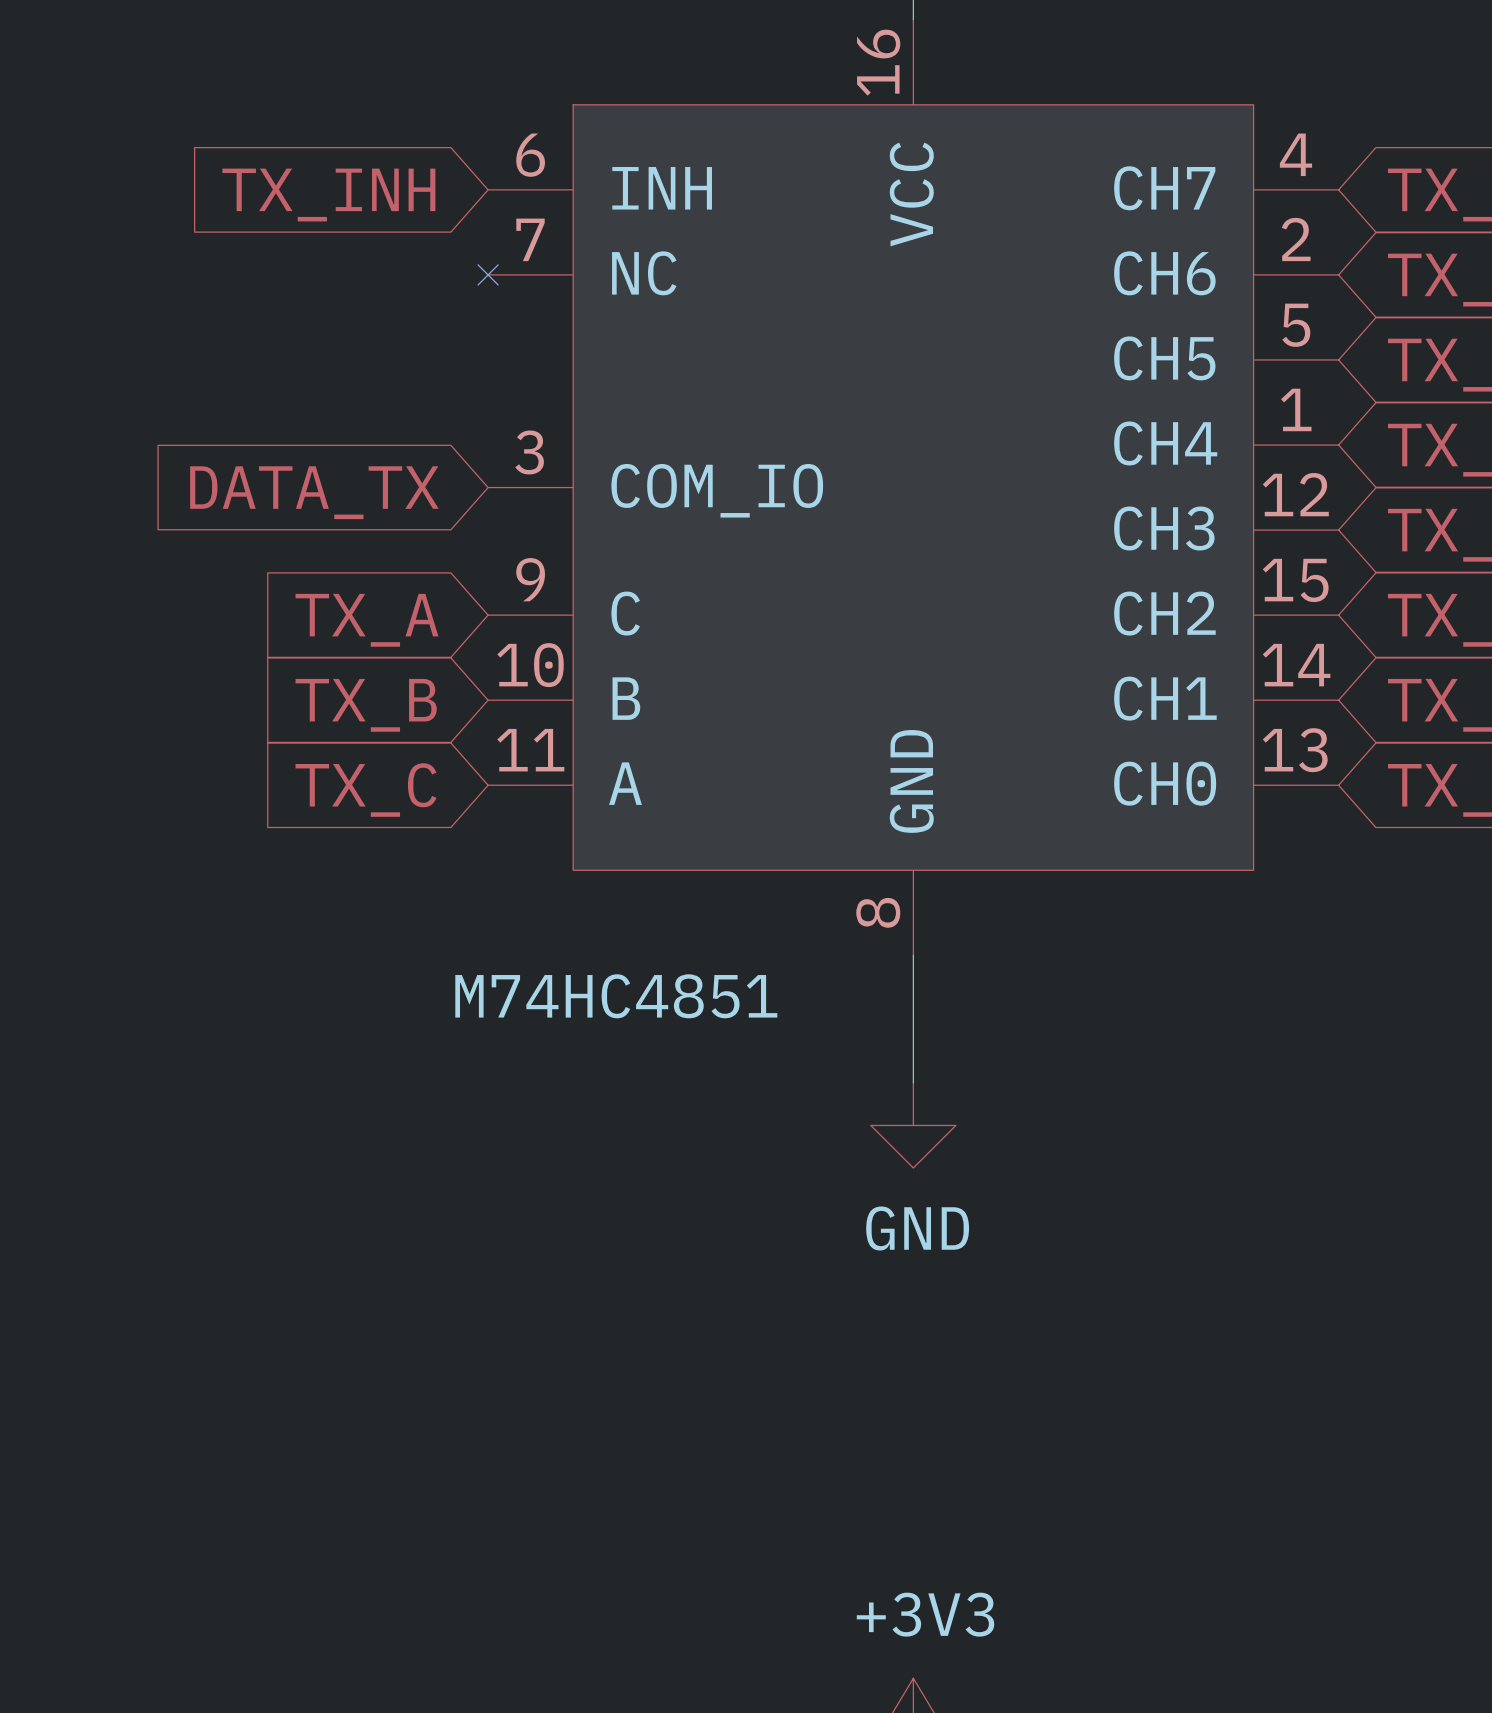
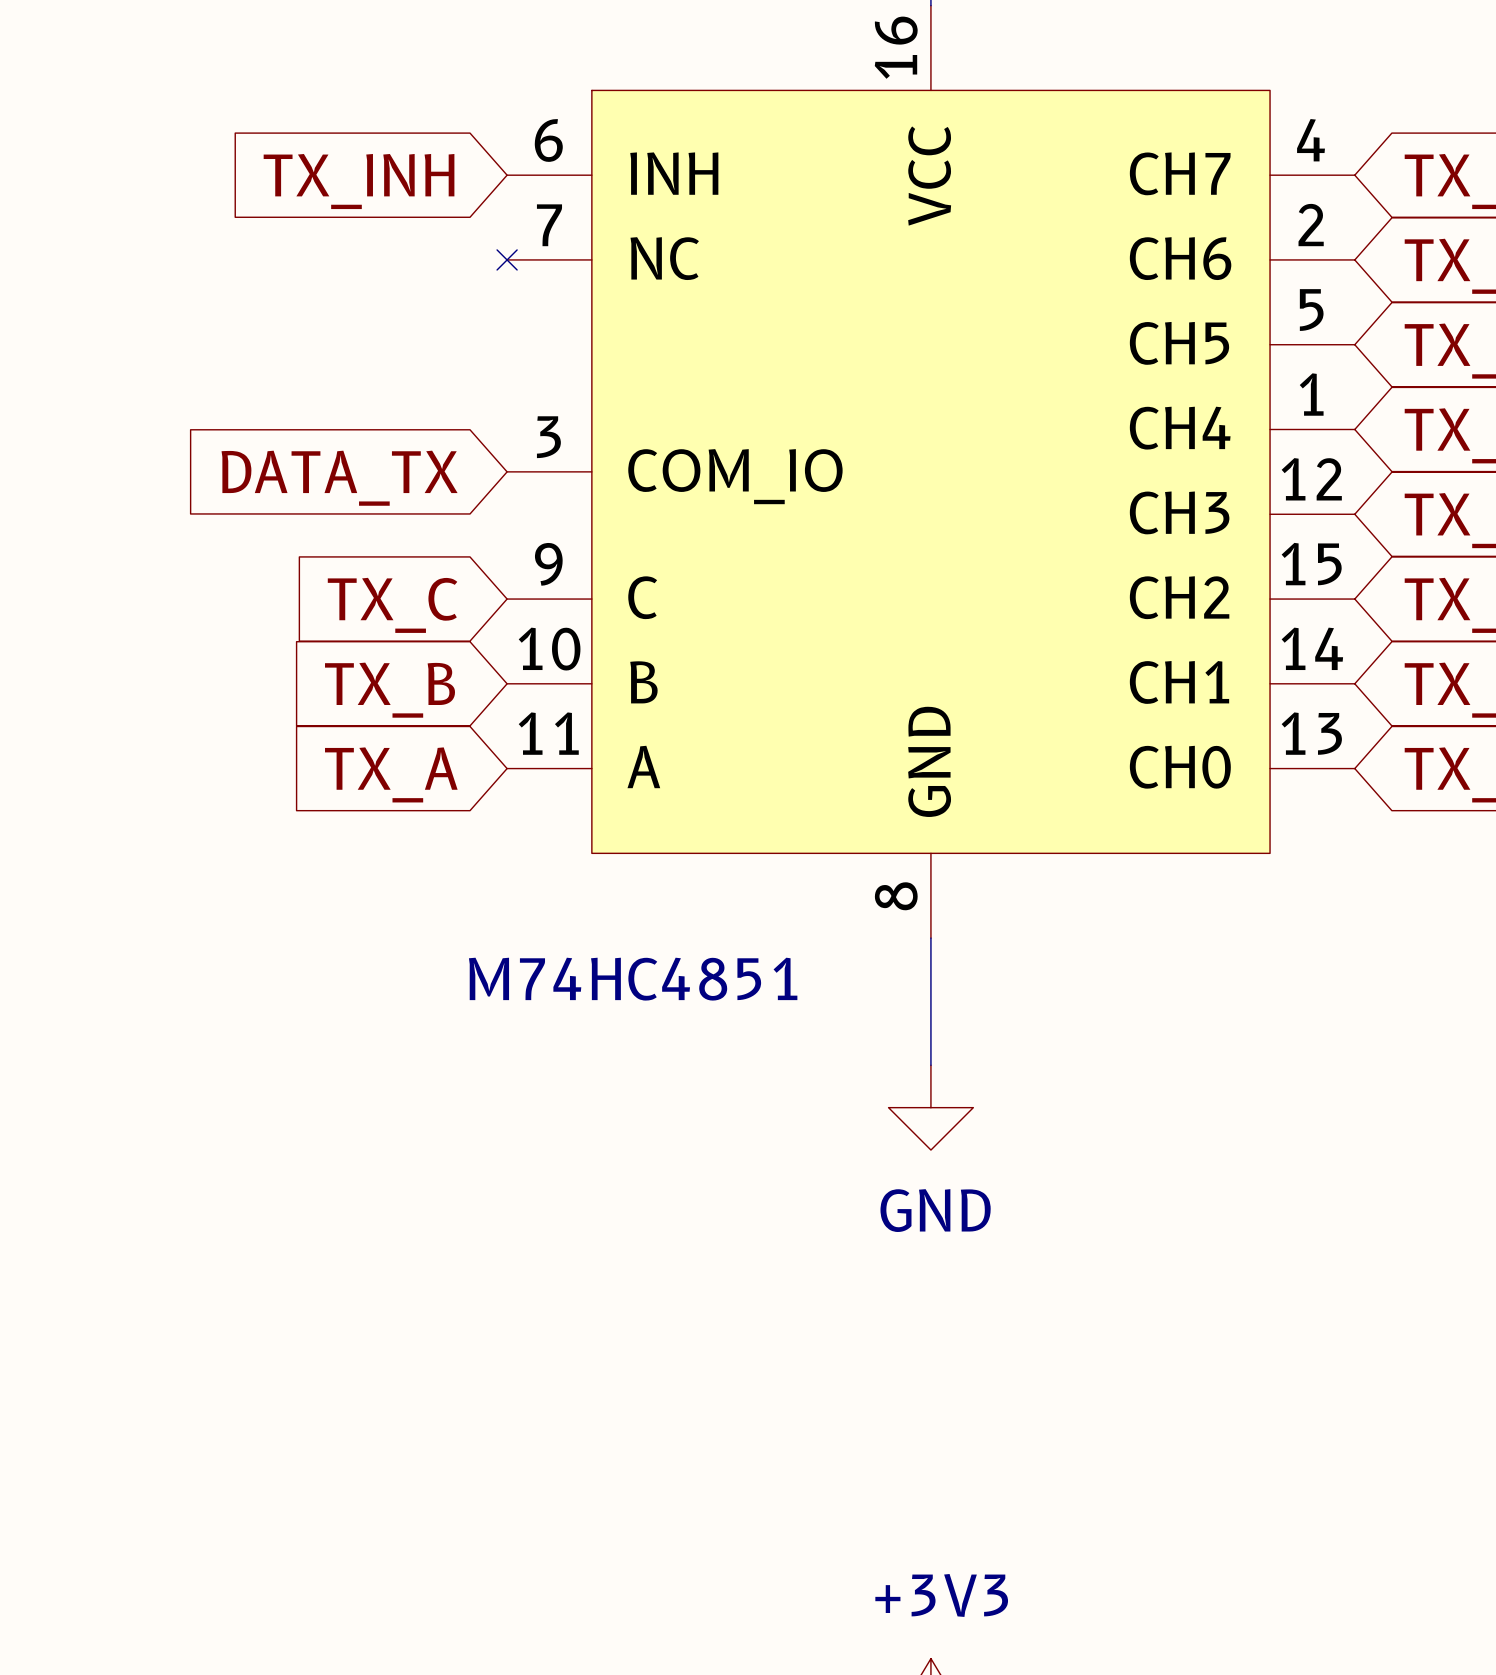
global label: TX_A (366, 620) -> TX_C (392, 605)
global label: TX_C (366, 790) -> TX_A (391, 774)

